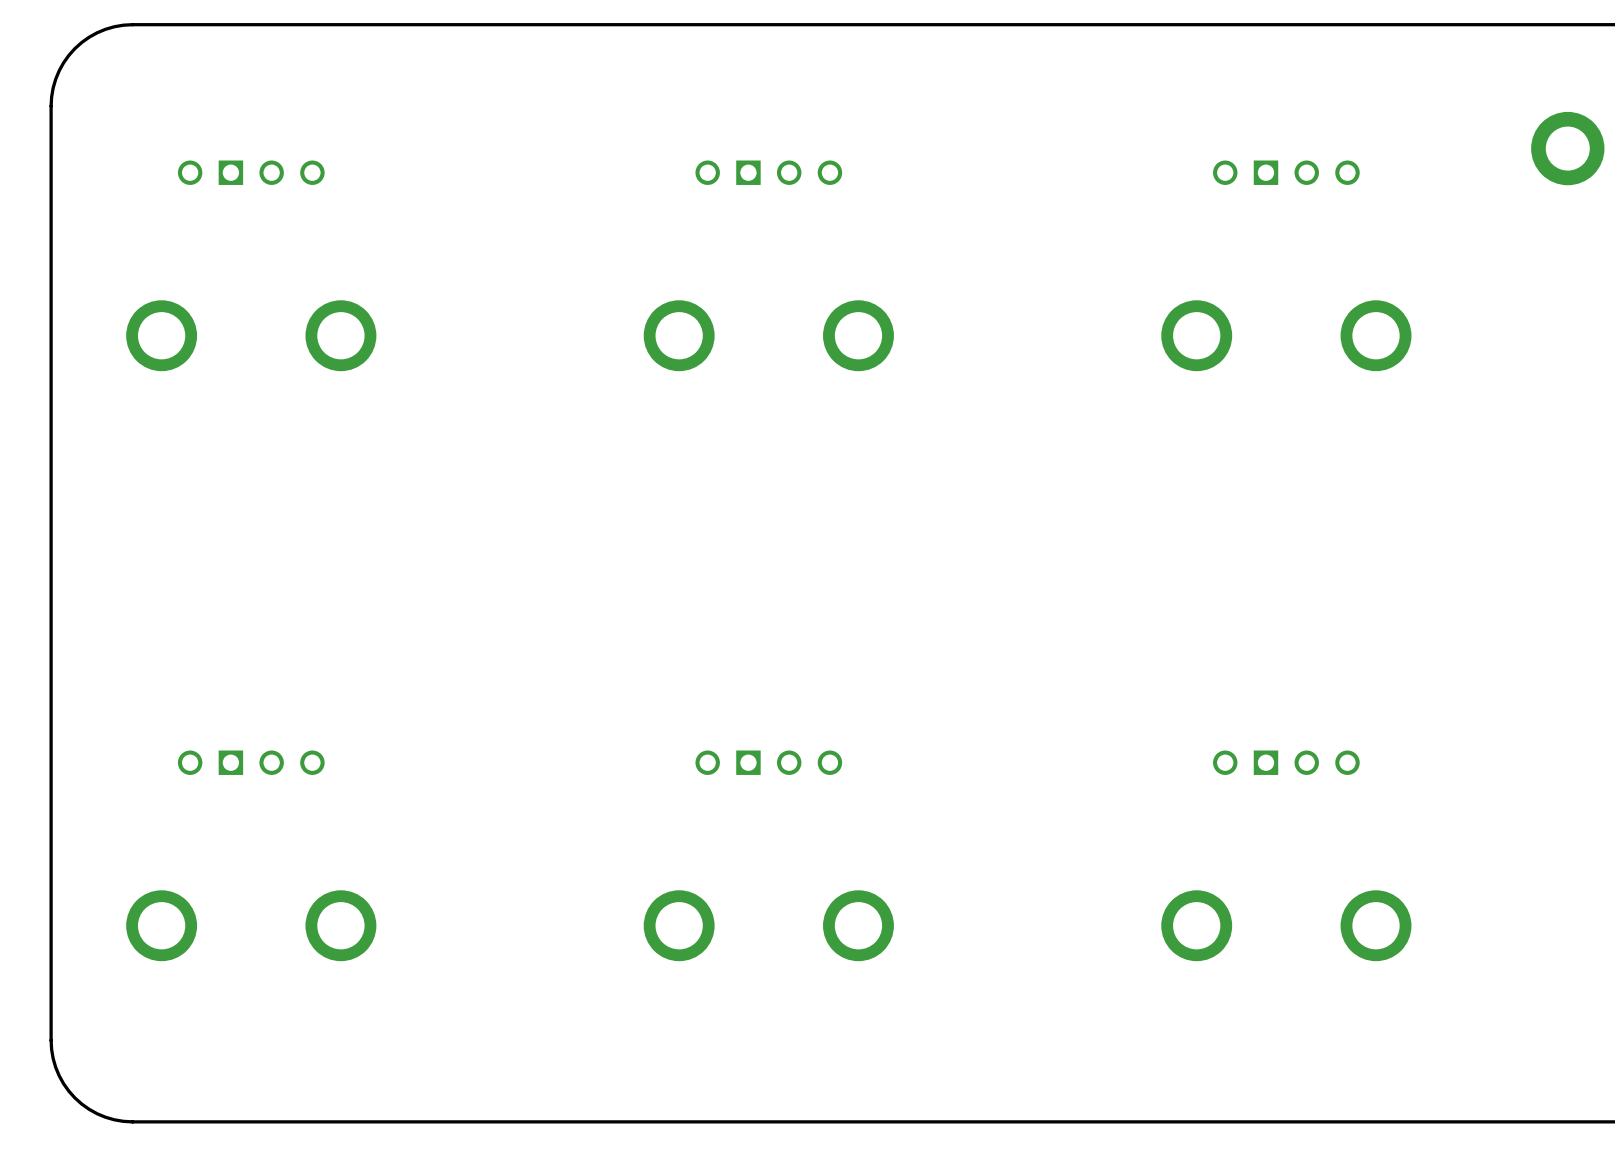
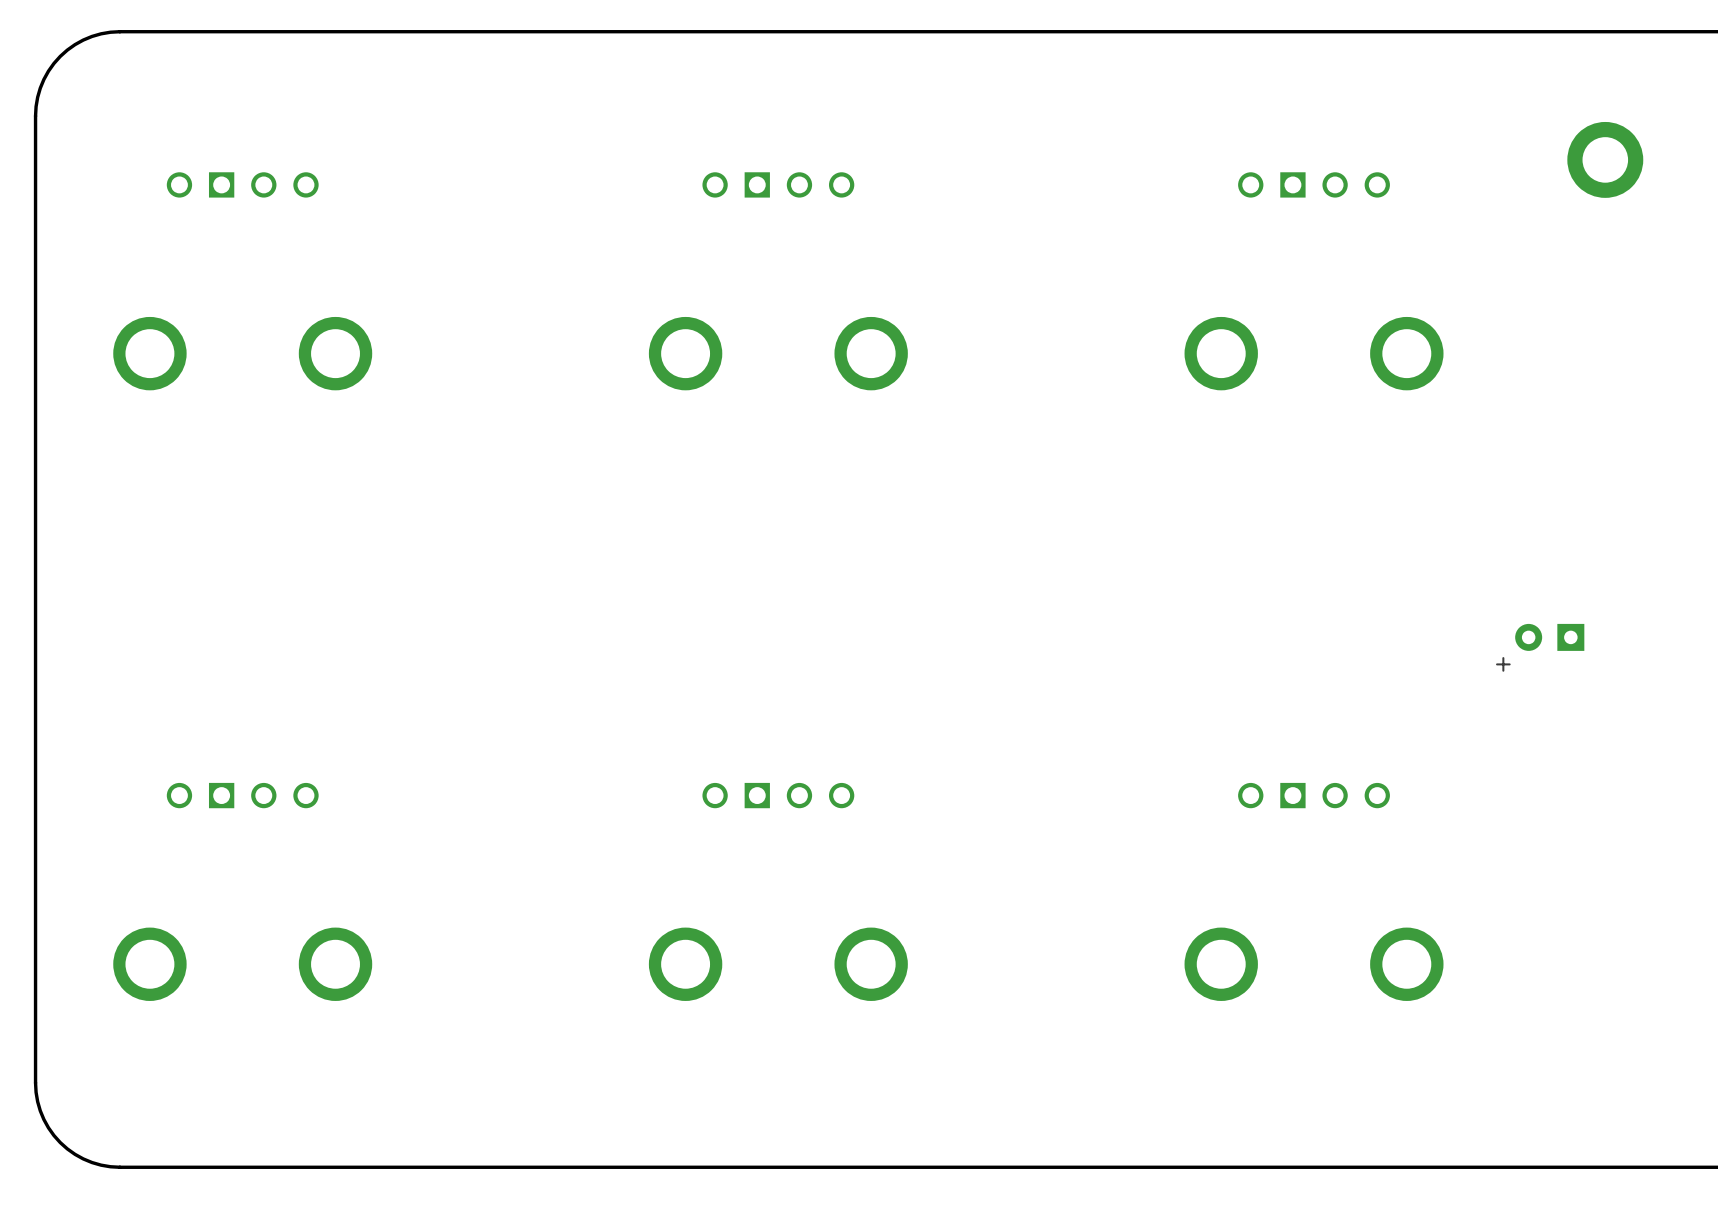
part: none -> (1540, 647)

